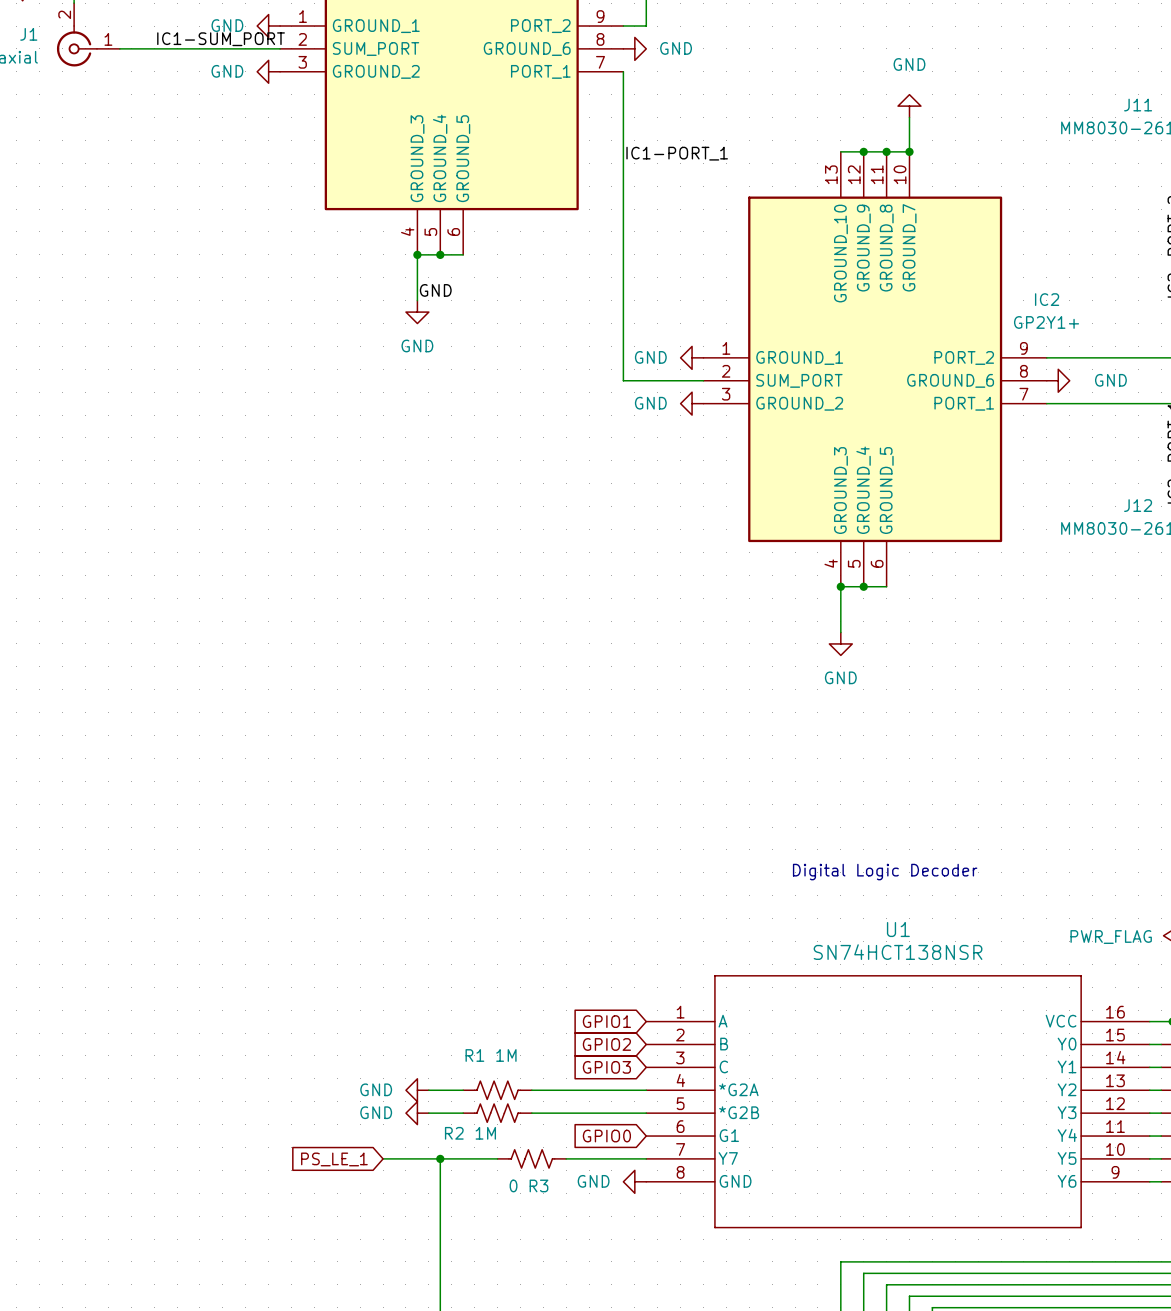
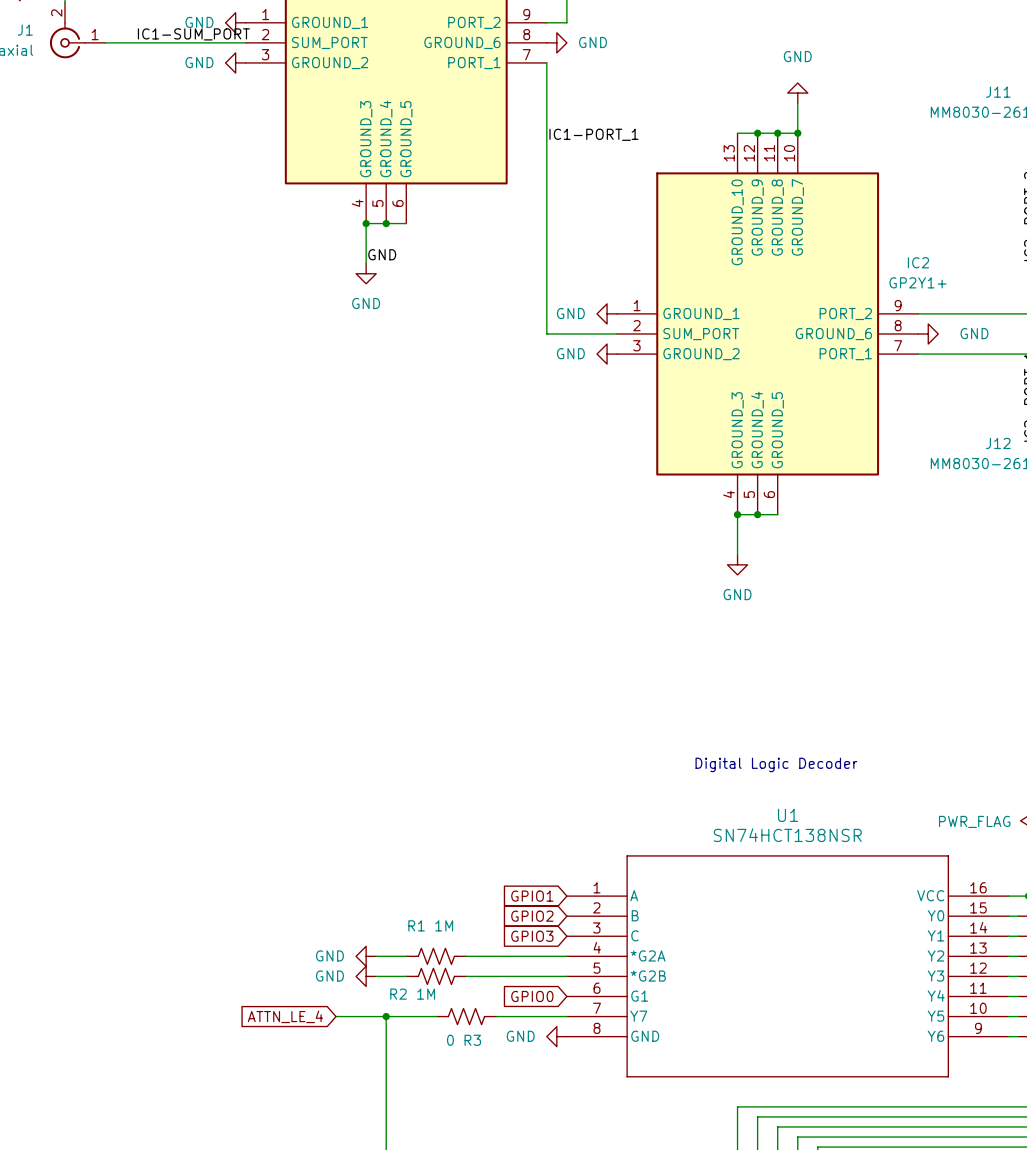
global label: PS_LE_1 (334, 1159) -> ATTN_LE_4 (285, 1016)

